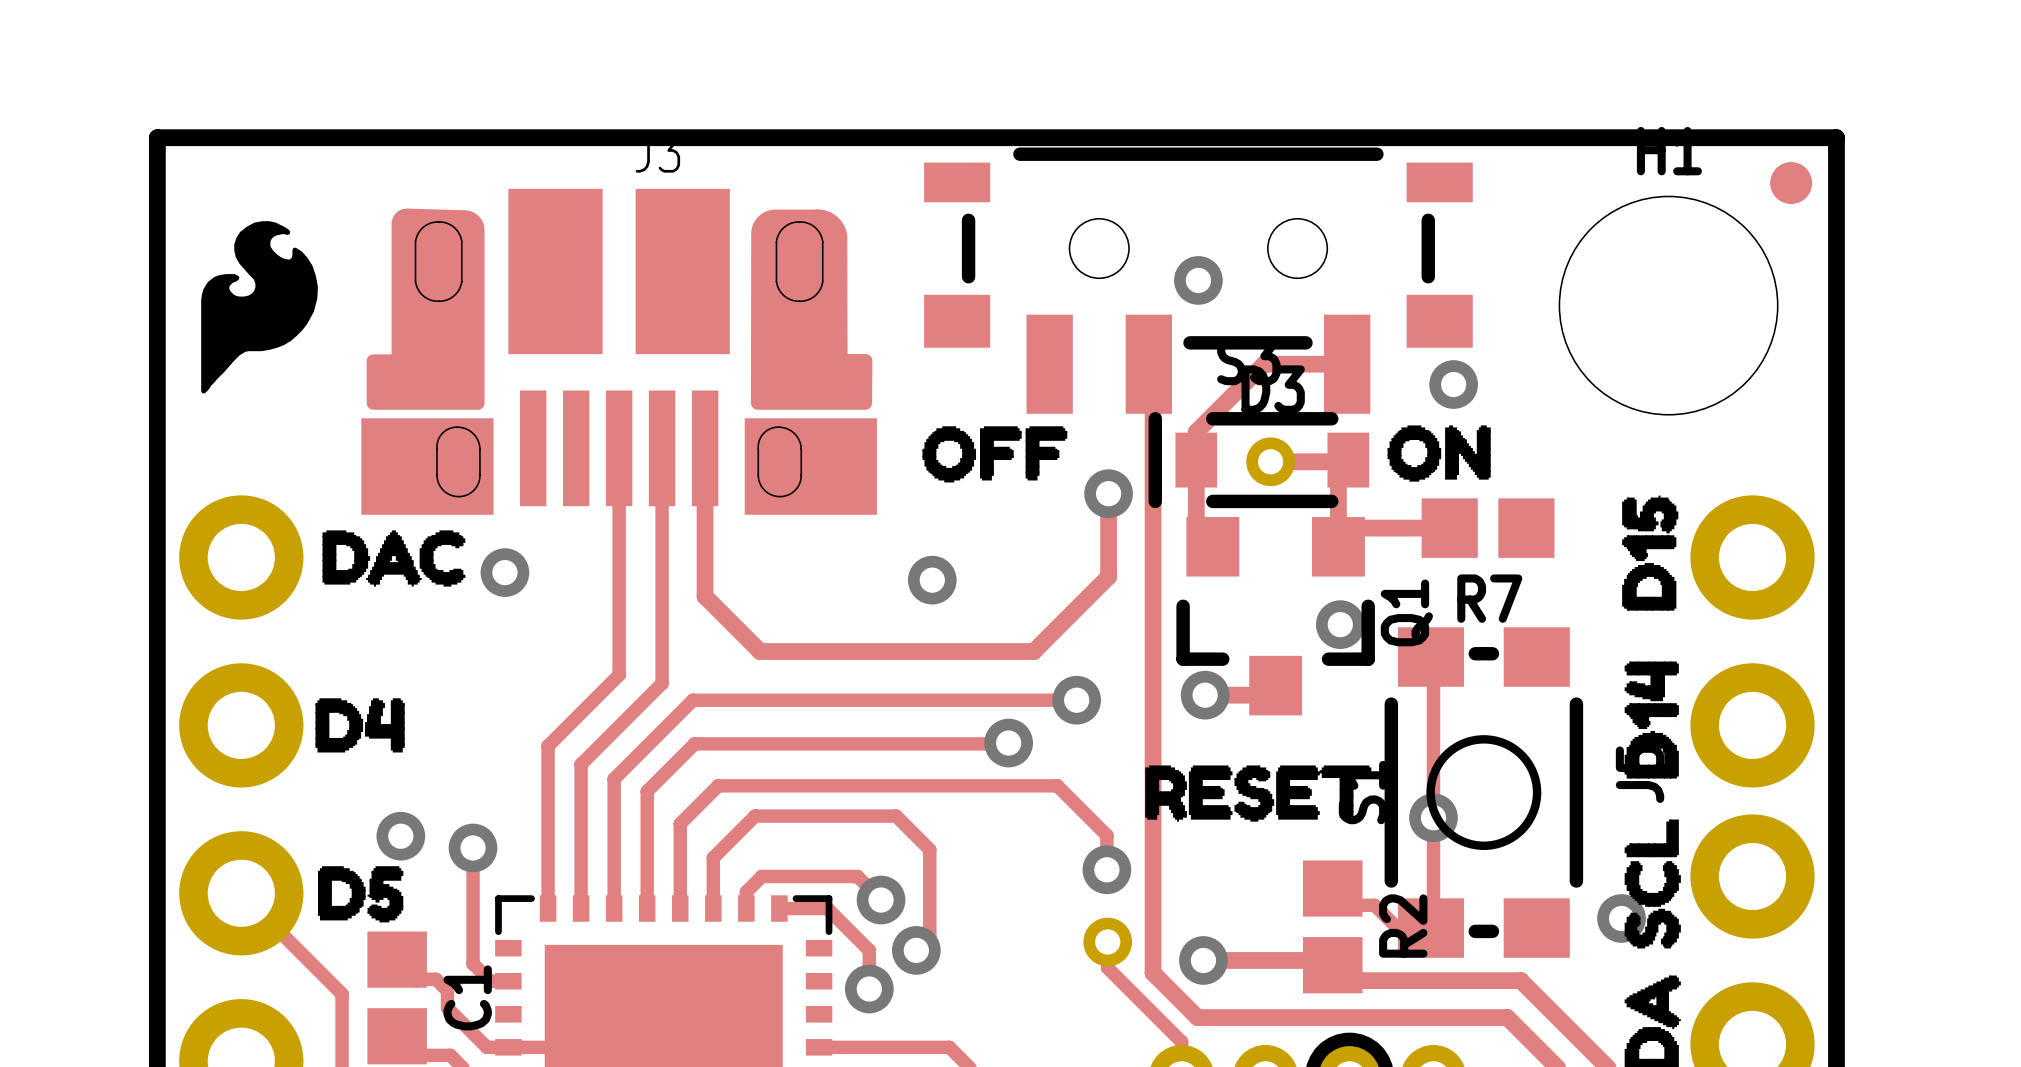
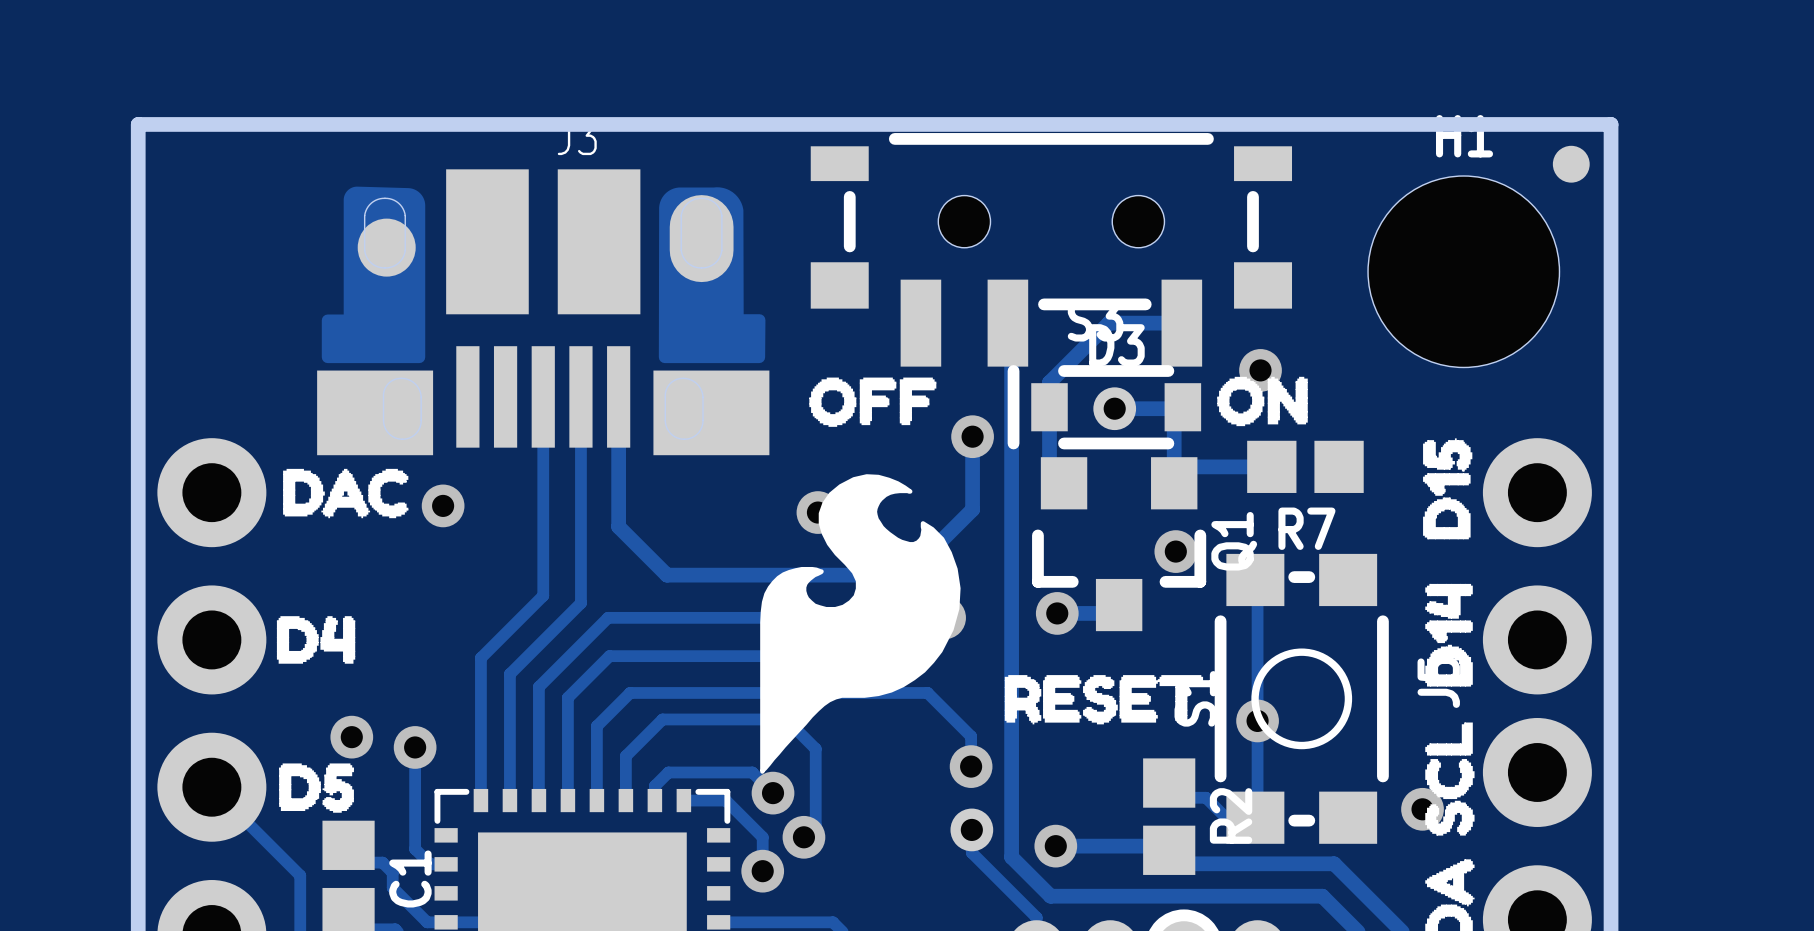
drawing: [201, 221, 318, 394] -> none
via: (1198, 280) -> none
via position: (1453, 384) -> (1260, 370)
drawing: none -> [760, 474, 961, 774]

